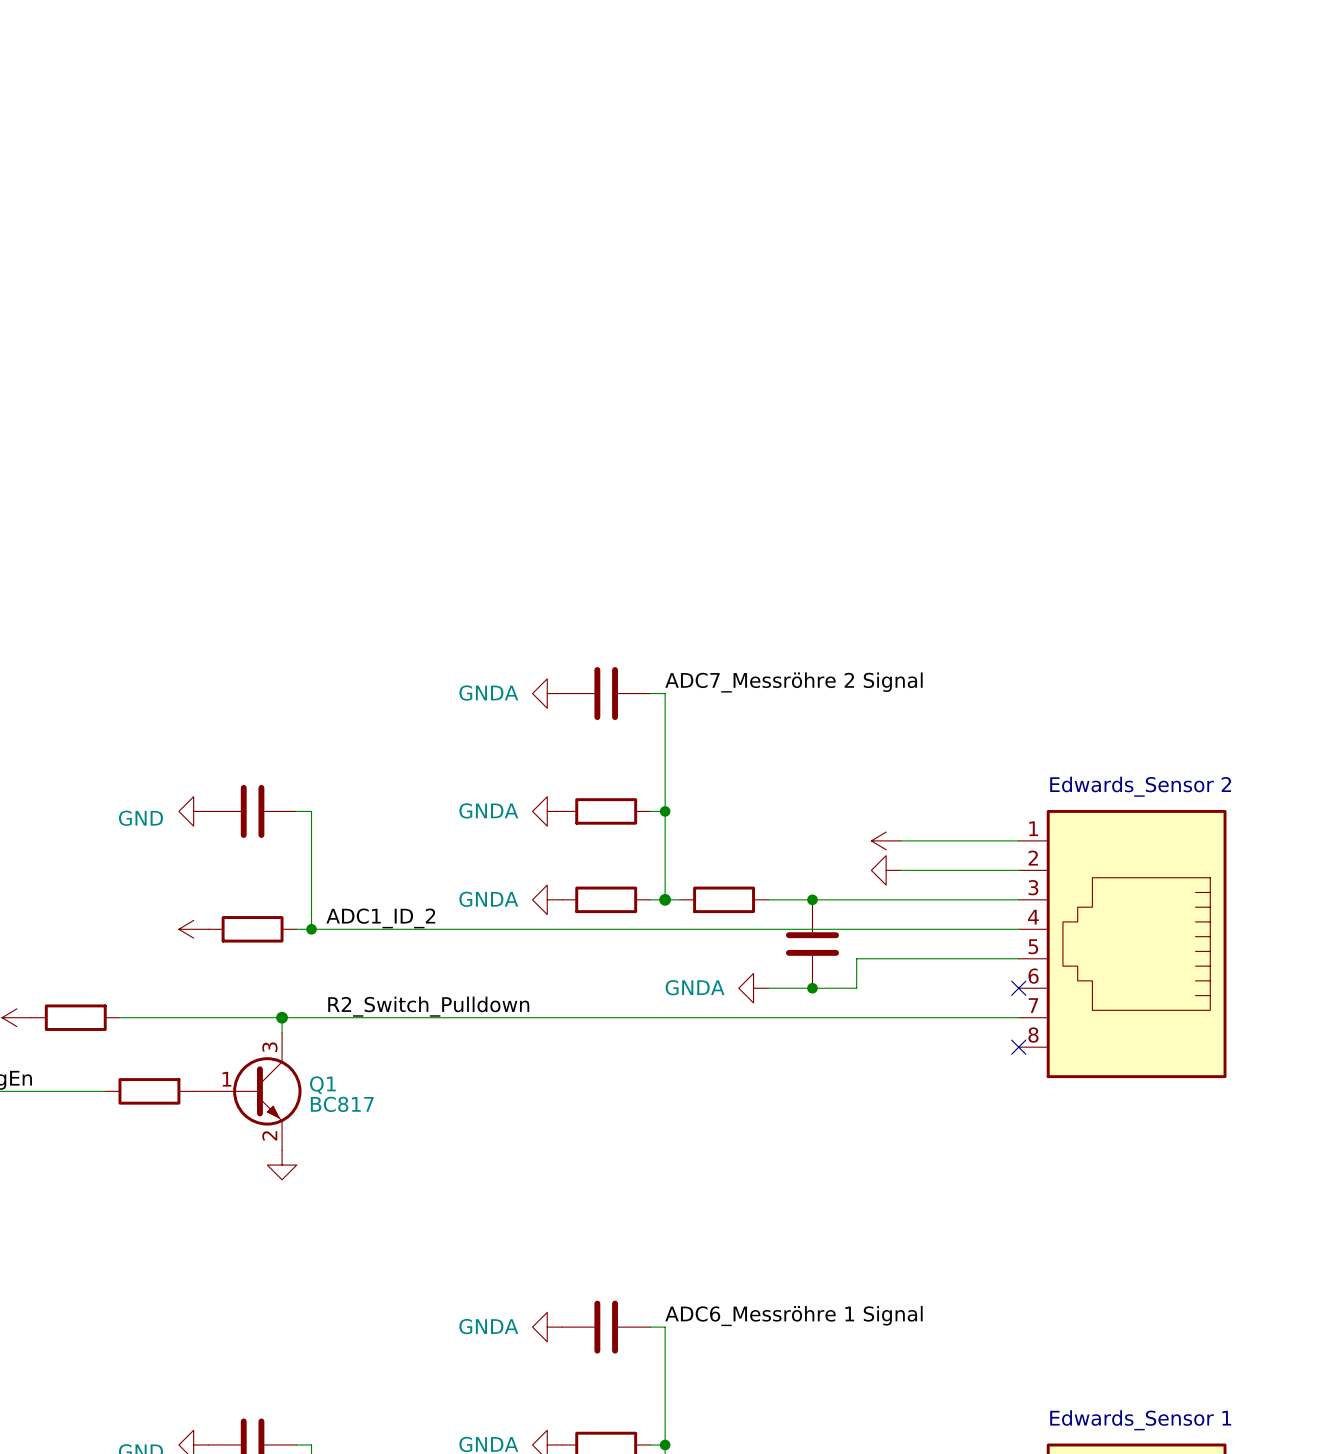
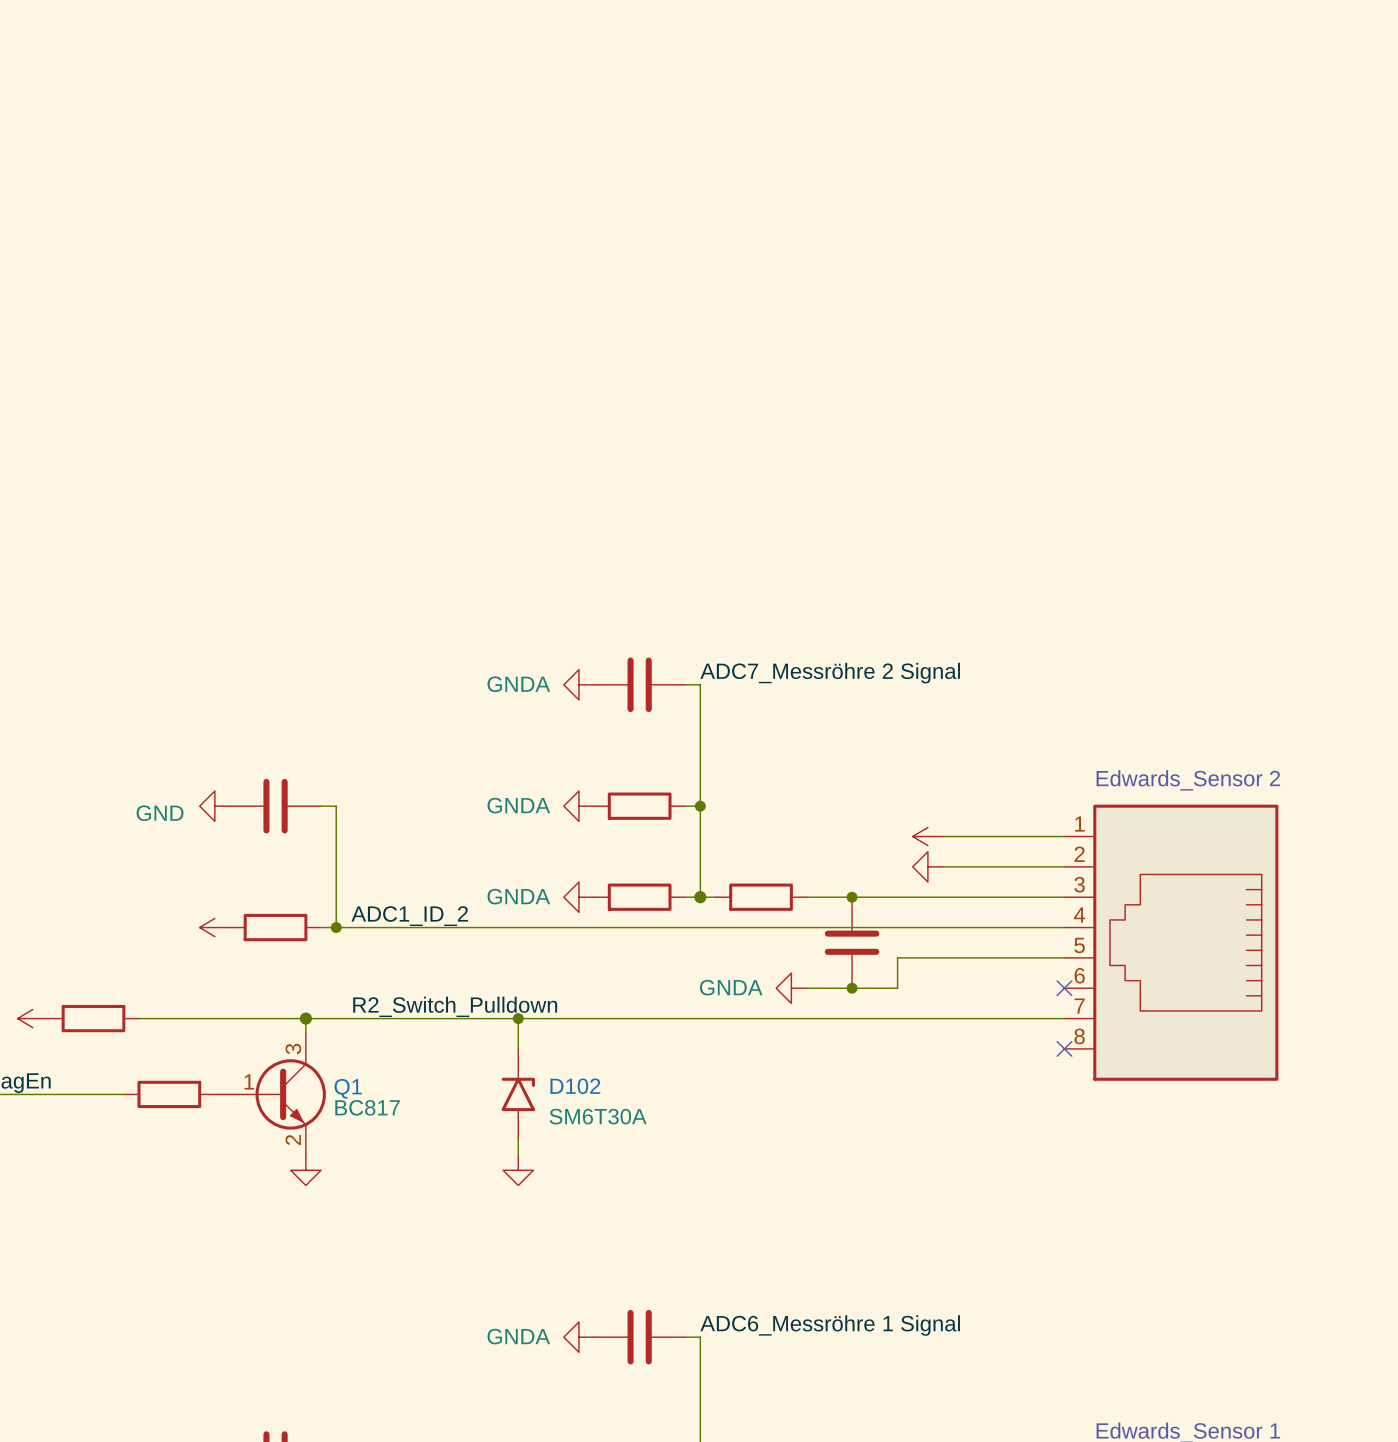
wire: none -> (518, 1018) (518, 1048)
junction: none -> (518, 1018)
D102: none -> SM6T30A (518, 1094)
wire: none -> (518, 1139) (518, 1155)
power symbol: none -> (518, 1170)

